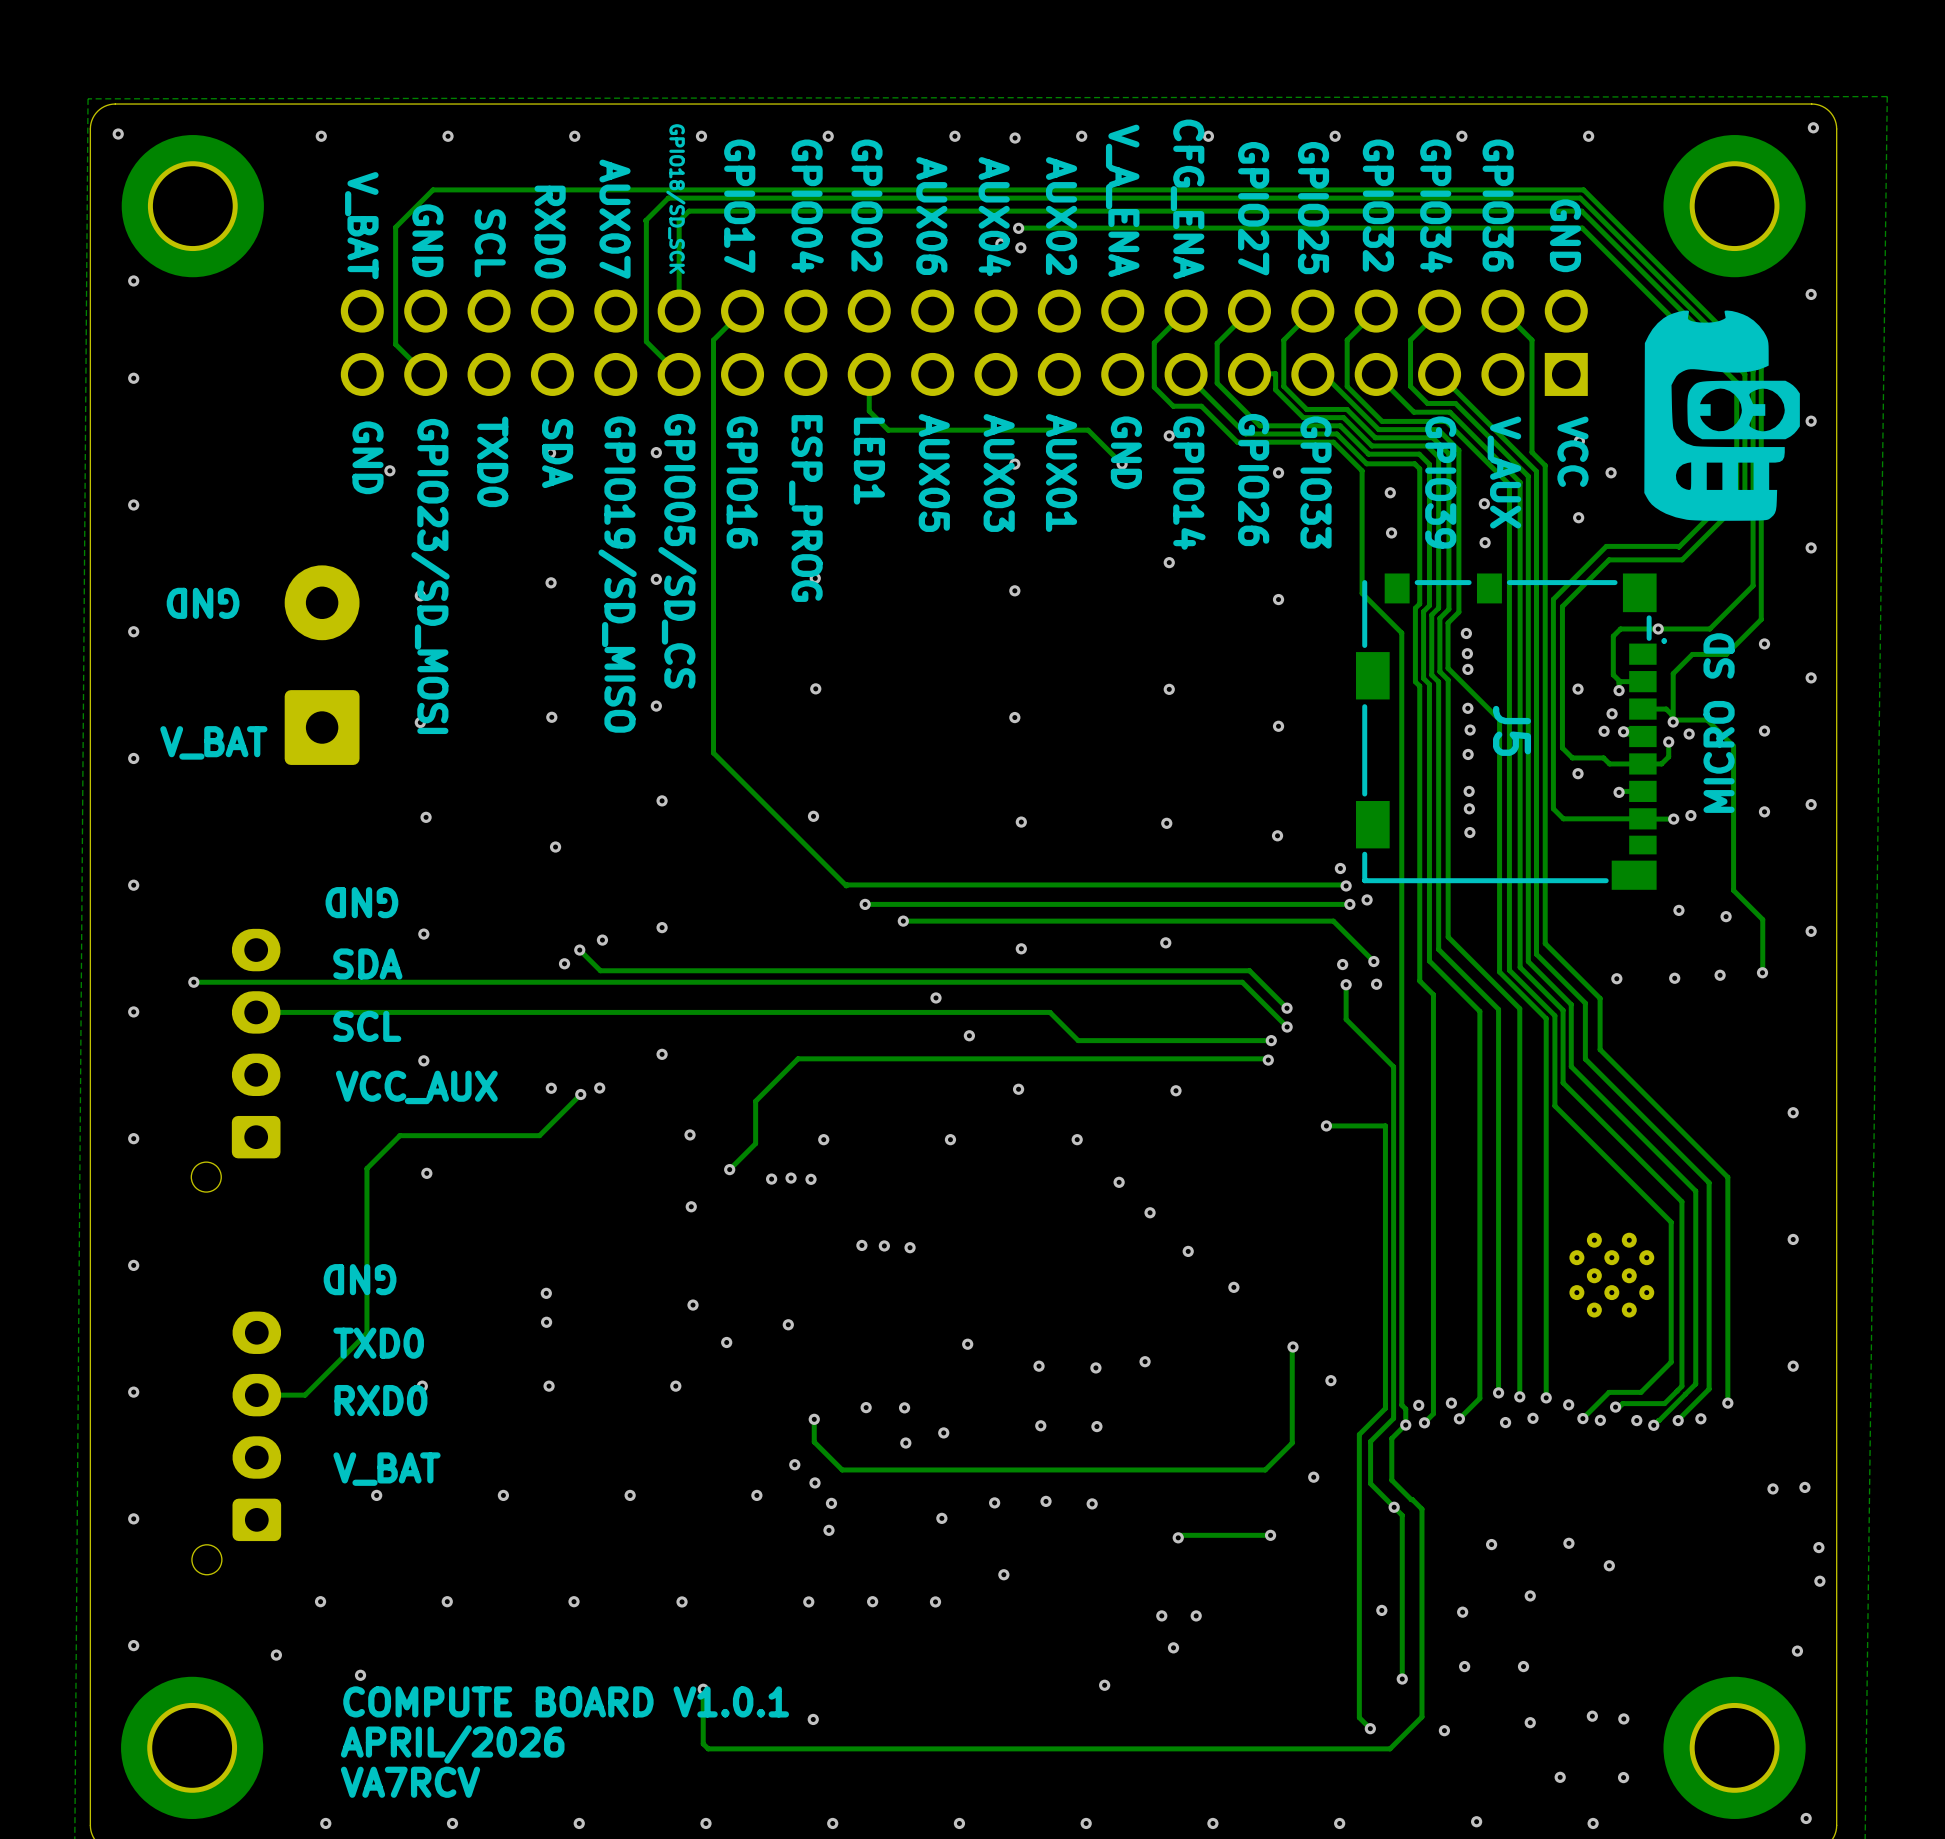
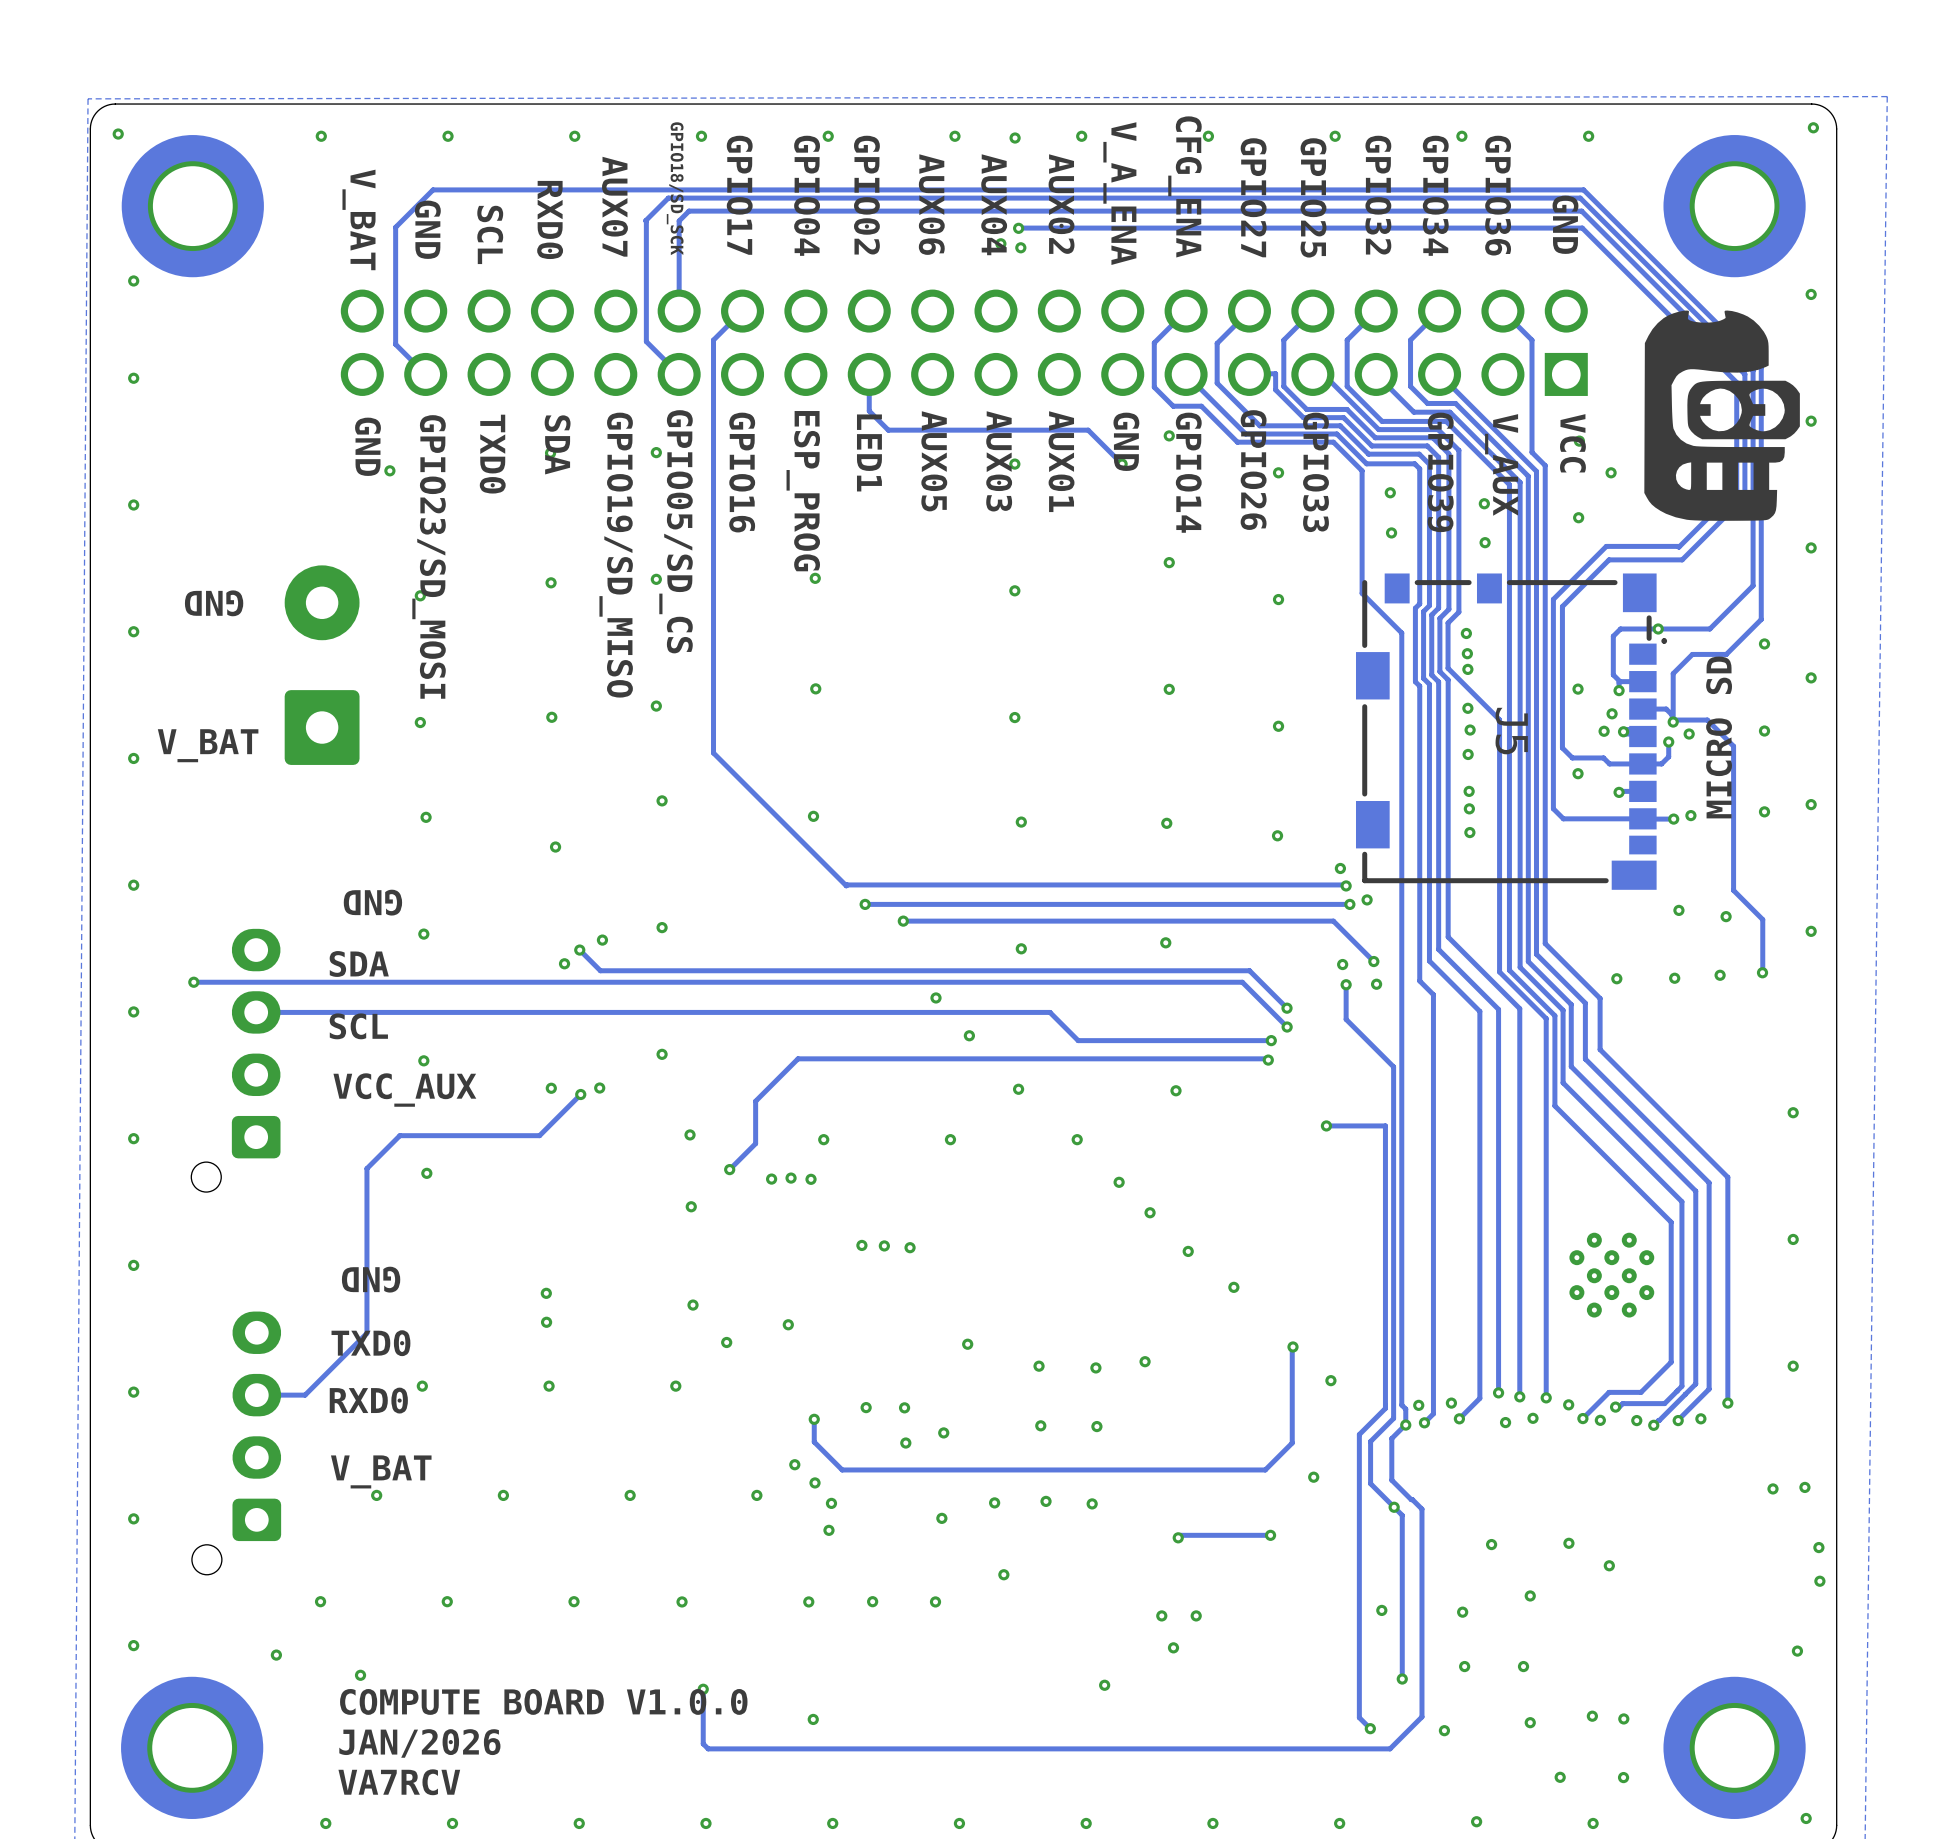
text: COMPUTE BOARD V1.0.1 (566, 1701) -> COMPUTE BOARD V1.0.0 (543, 1701)
text: APRIL/2026 (452, 1744) -> JAN/2026 (419, 1743)

